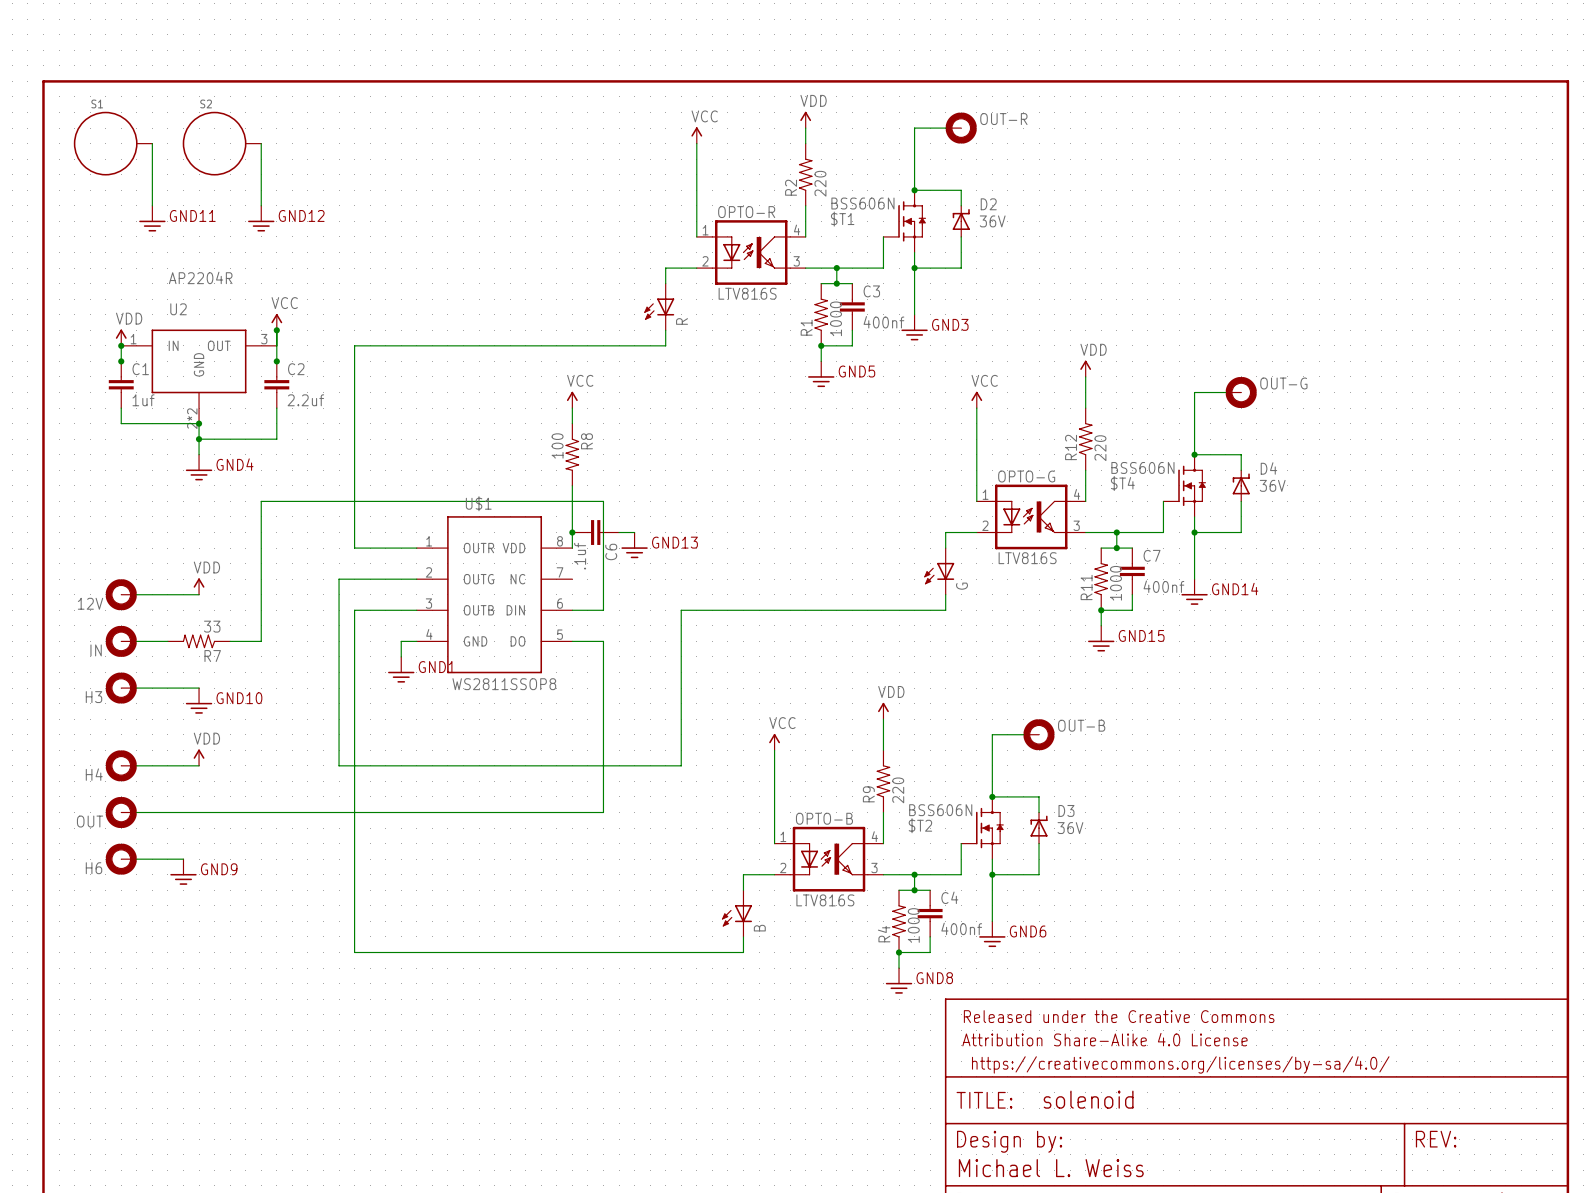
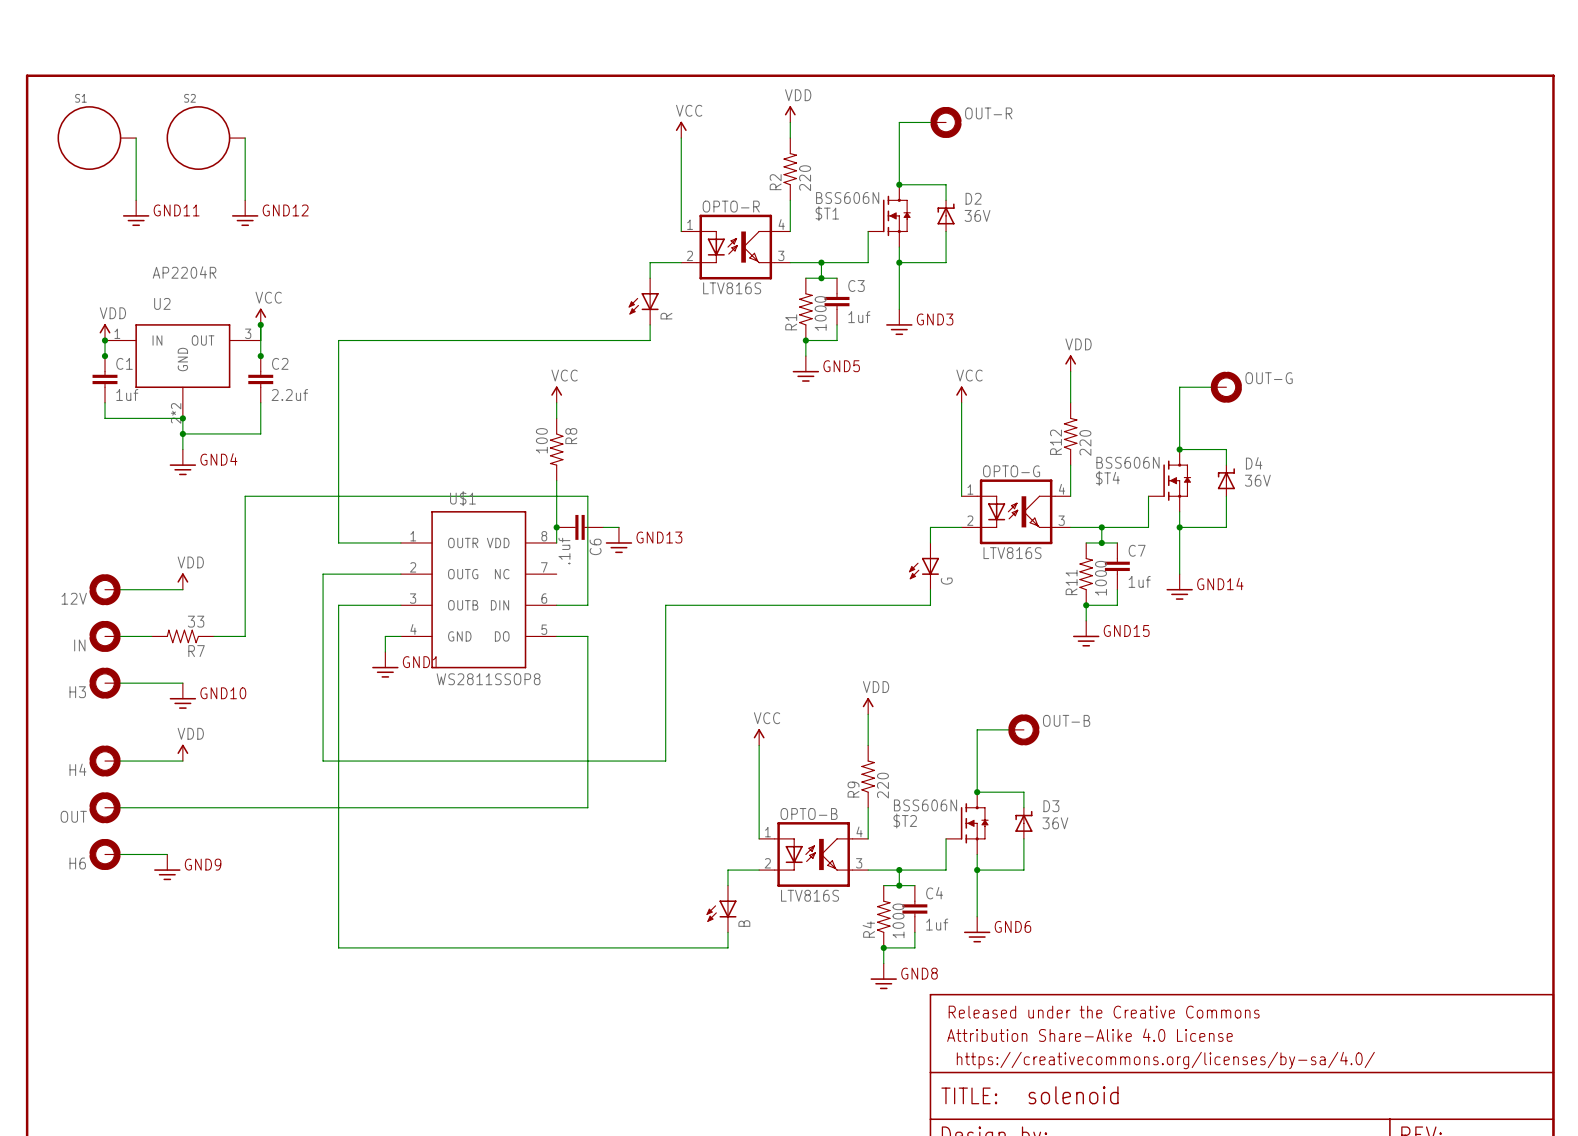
C3 value: 400nf (883, 322) -> 1uf (859, 317)
C7 value: 400nf (1163, 586) -> 1uf (1139, 581)
C4 value: 400nf (961, 928) -> 1uf (937, 924)

